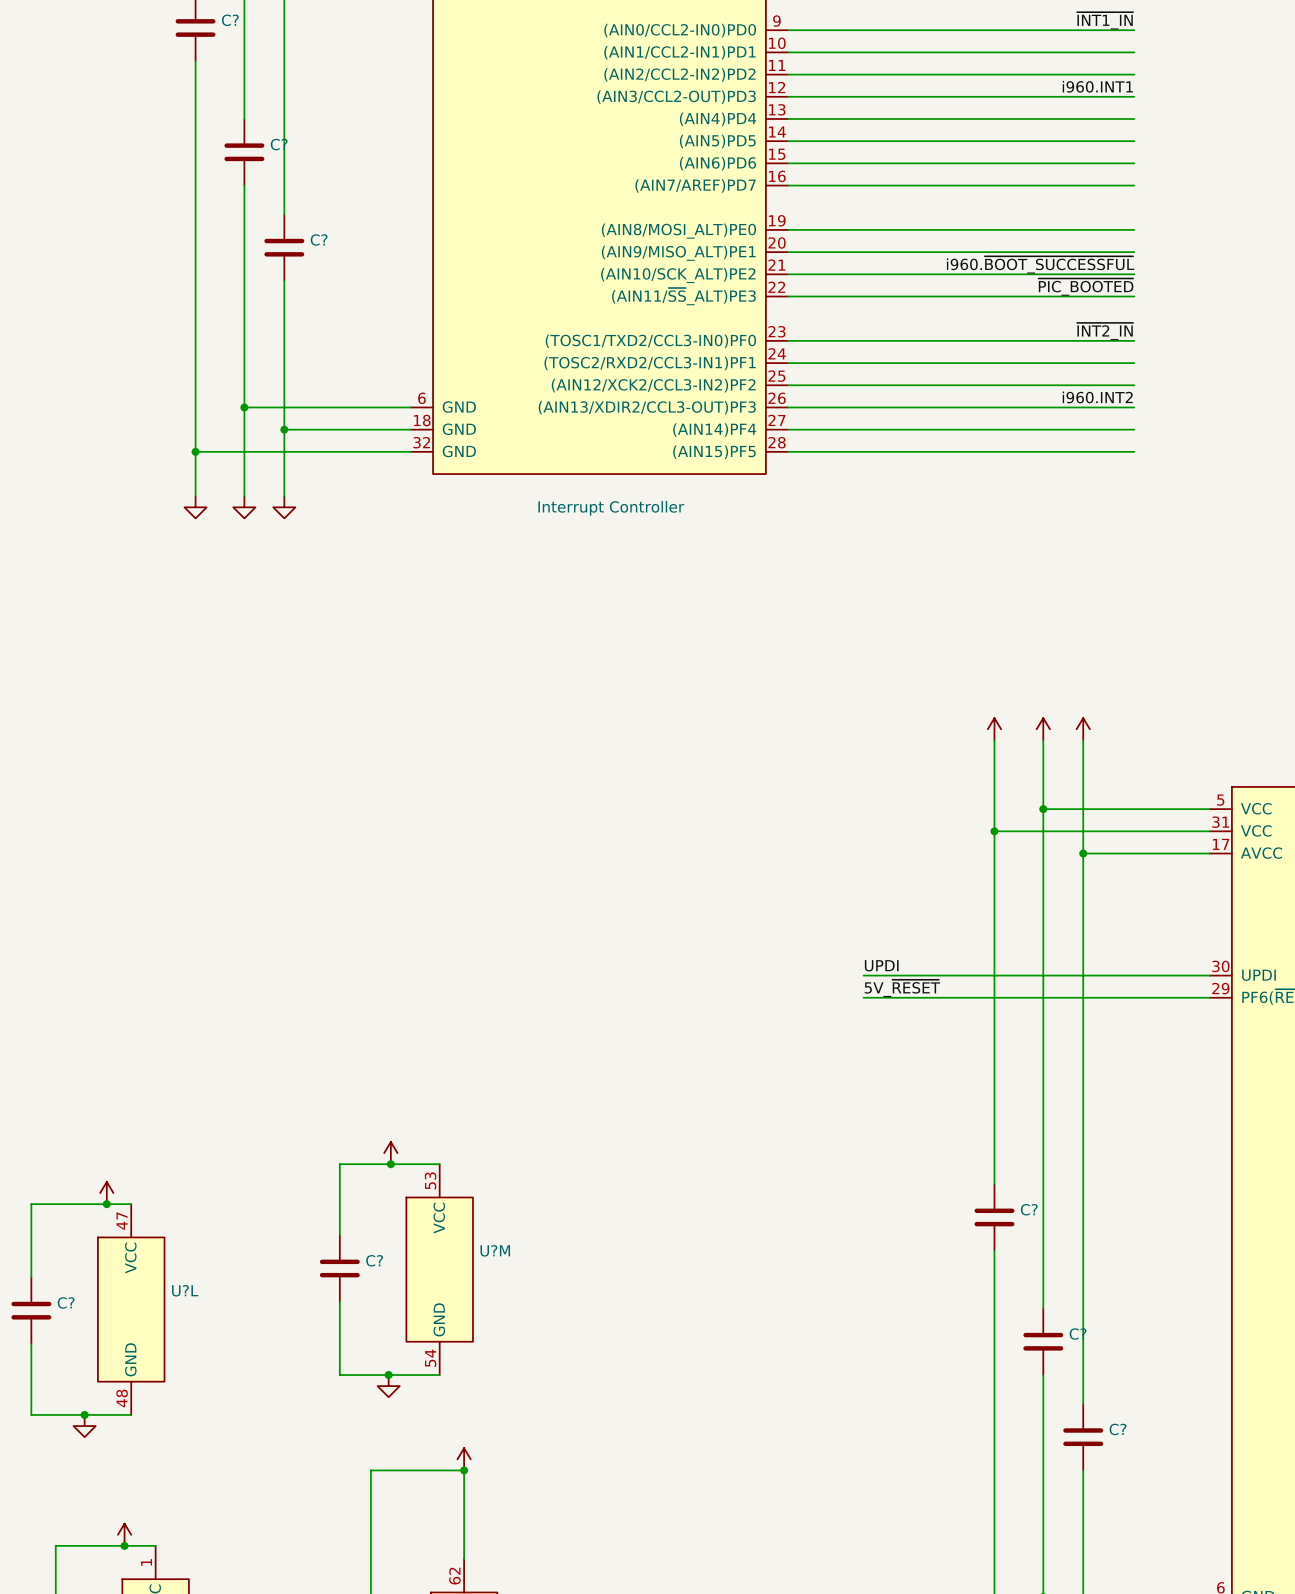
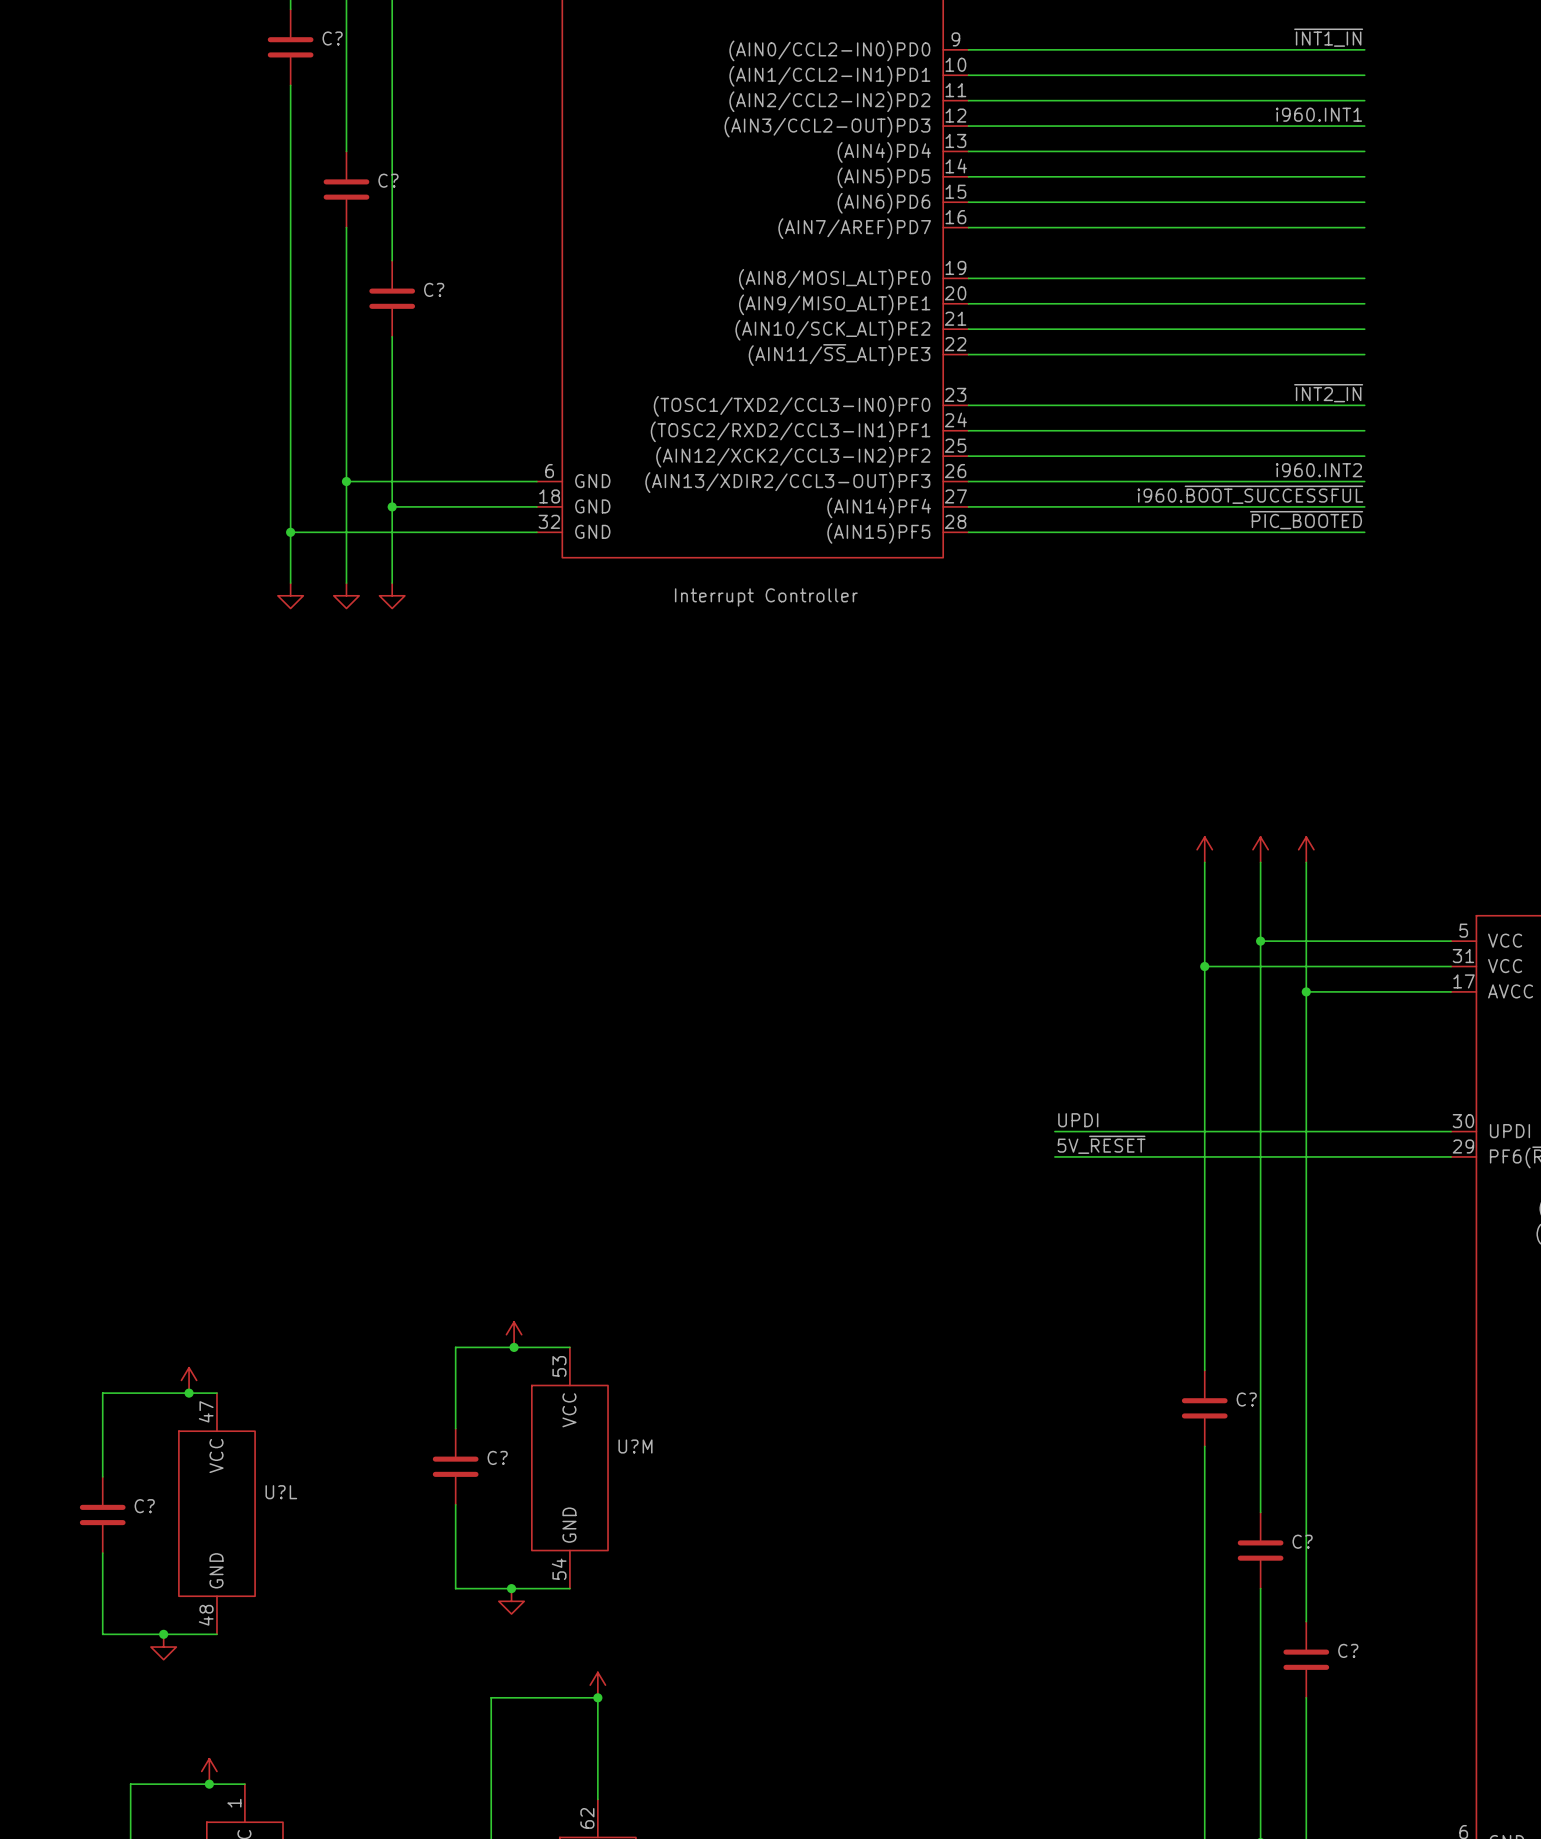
label position: i960.~{BOOT_SUCCESSFUL} (1040, 264) -> i960.~{BOOT_SUCCESSFUL} (1250, 494)
label position: ~{PIC_BOOTED} (1085, 287) -> ~{PIC_BOOTED} (1306, 520)

